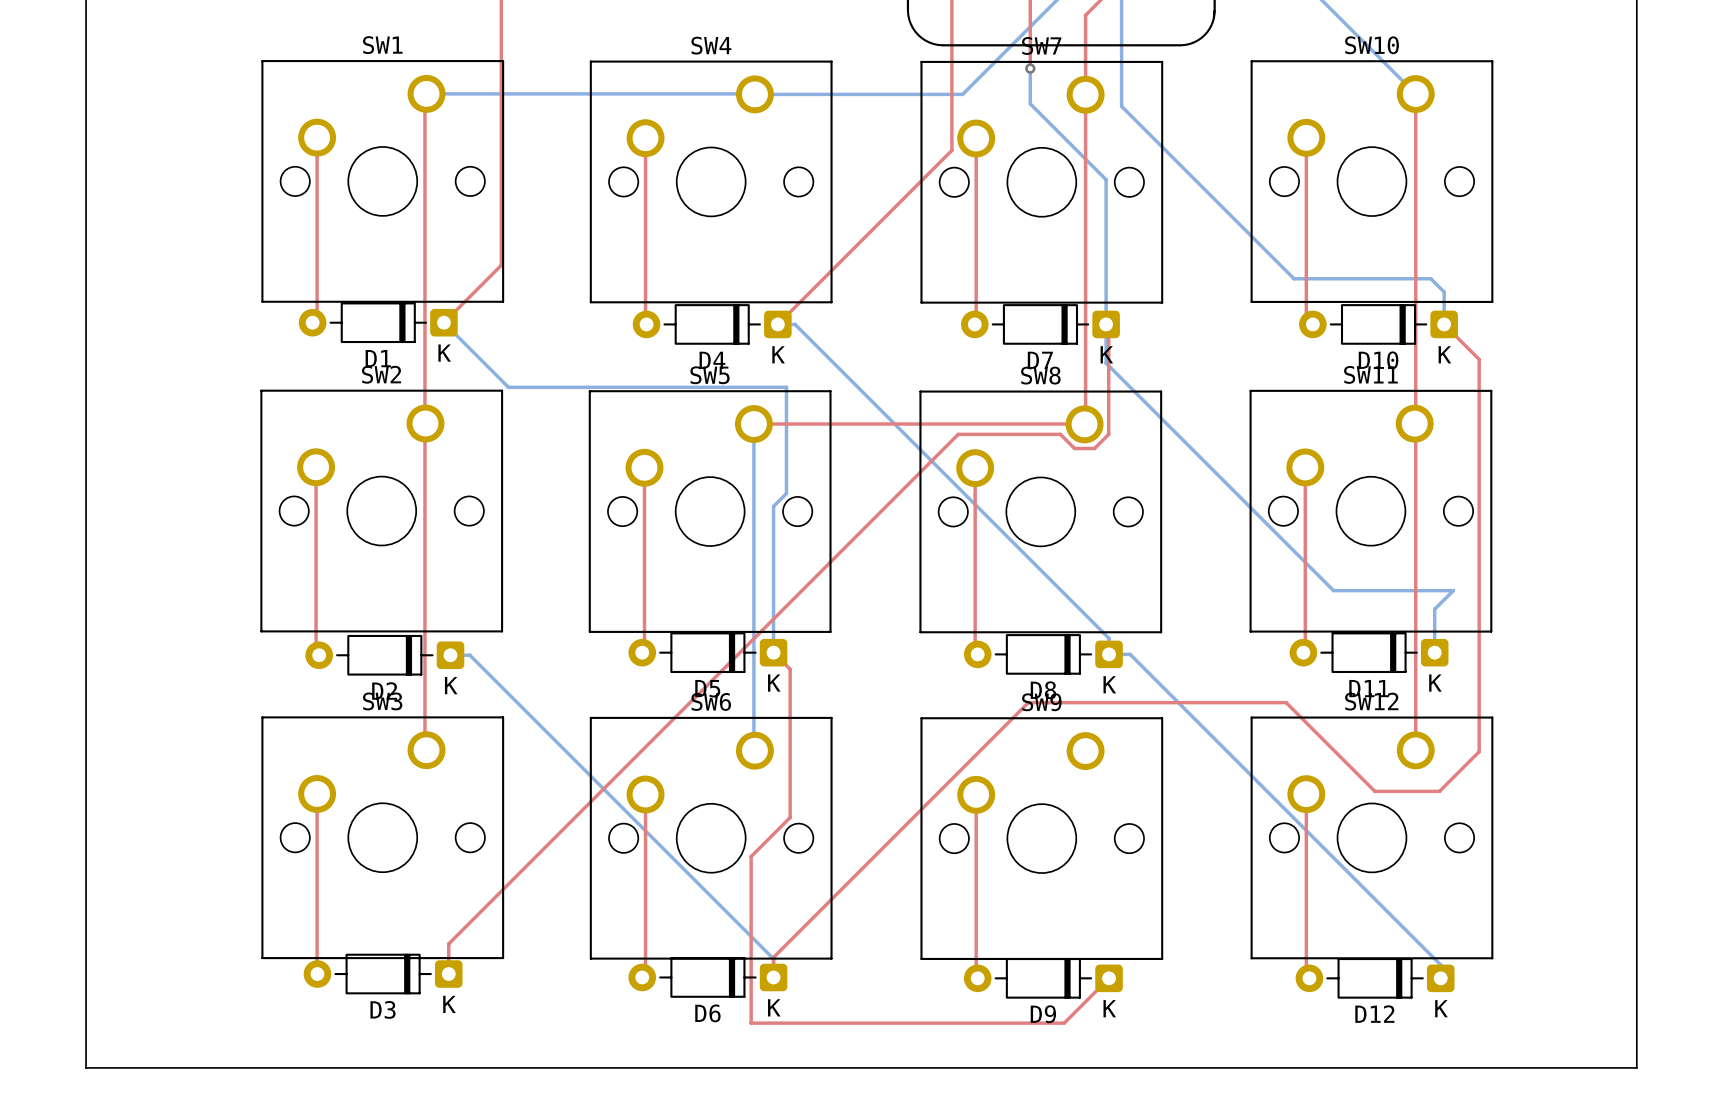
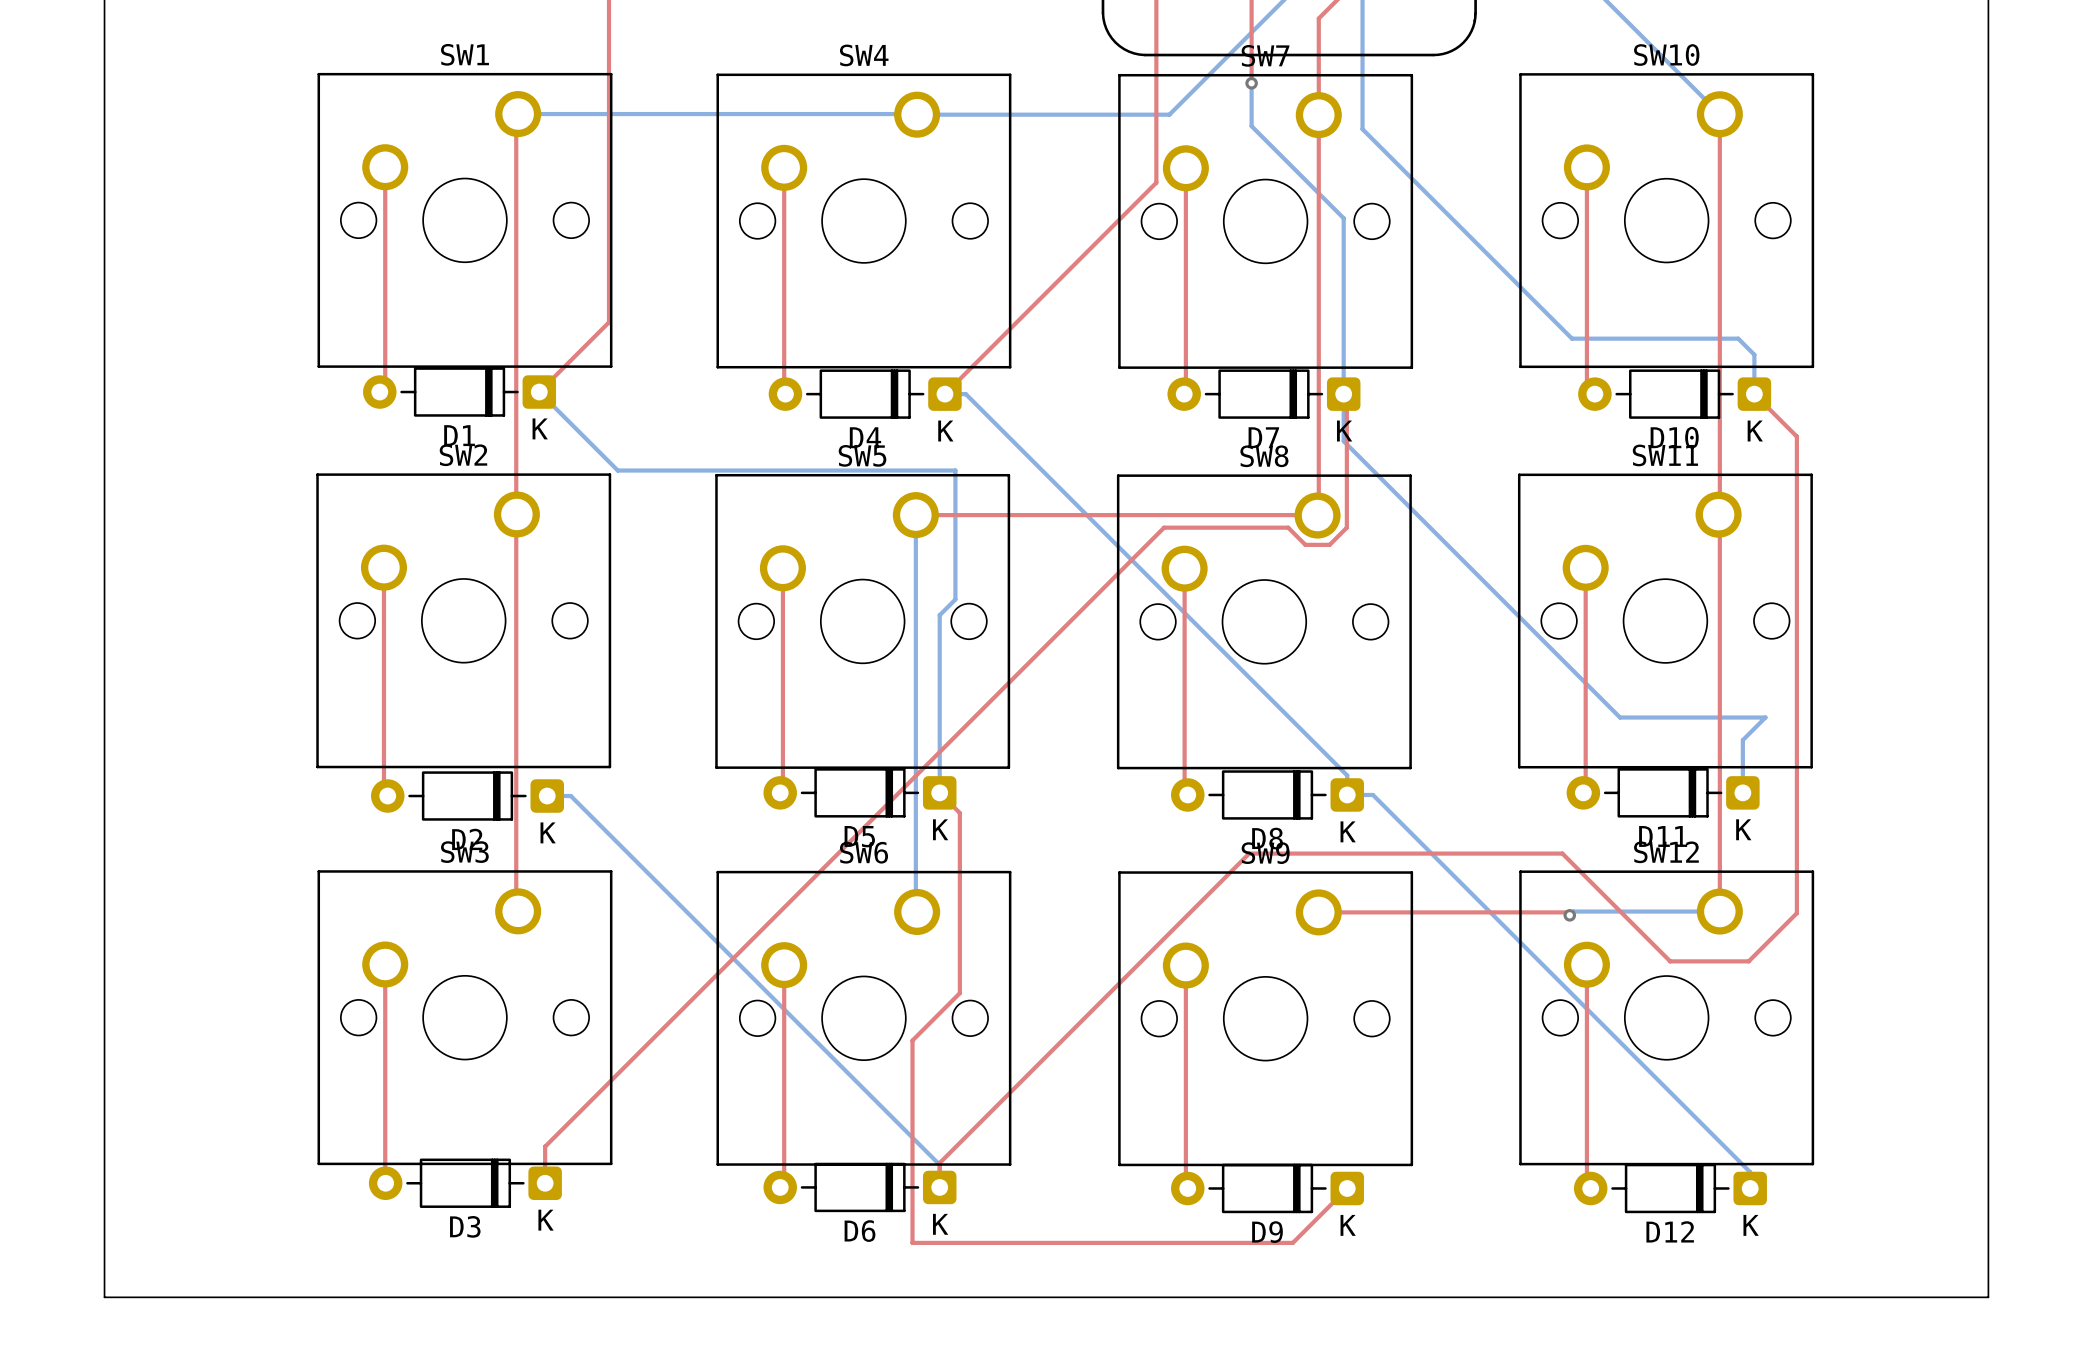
bottom track: none -> (1719, 911) (1573, 911) (1569, 915)
top track: none -> (1318, 912) (1566, 912) (1569, 915)
via: none -> (1569, 915)

